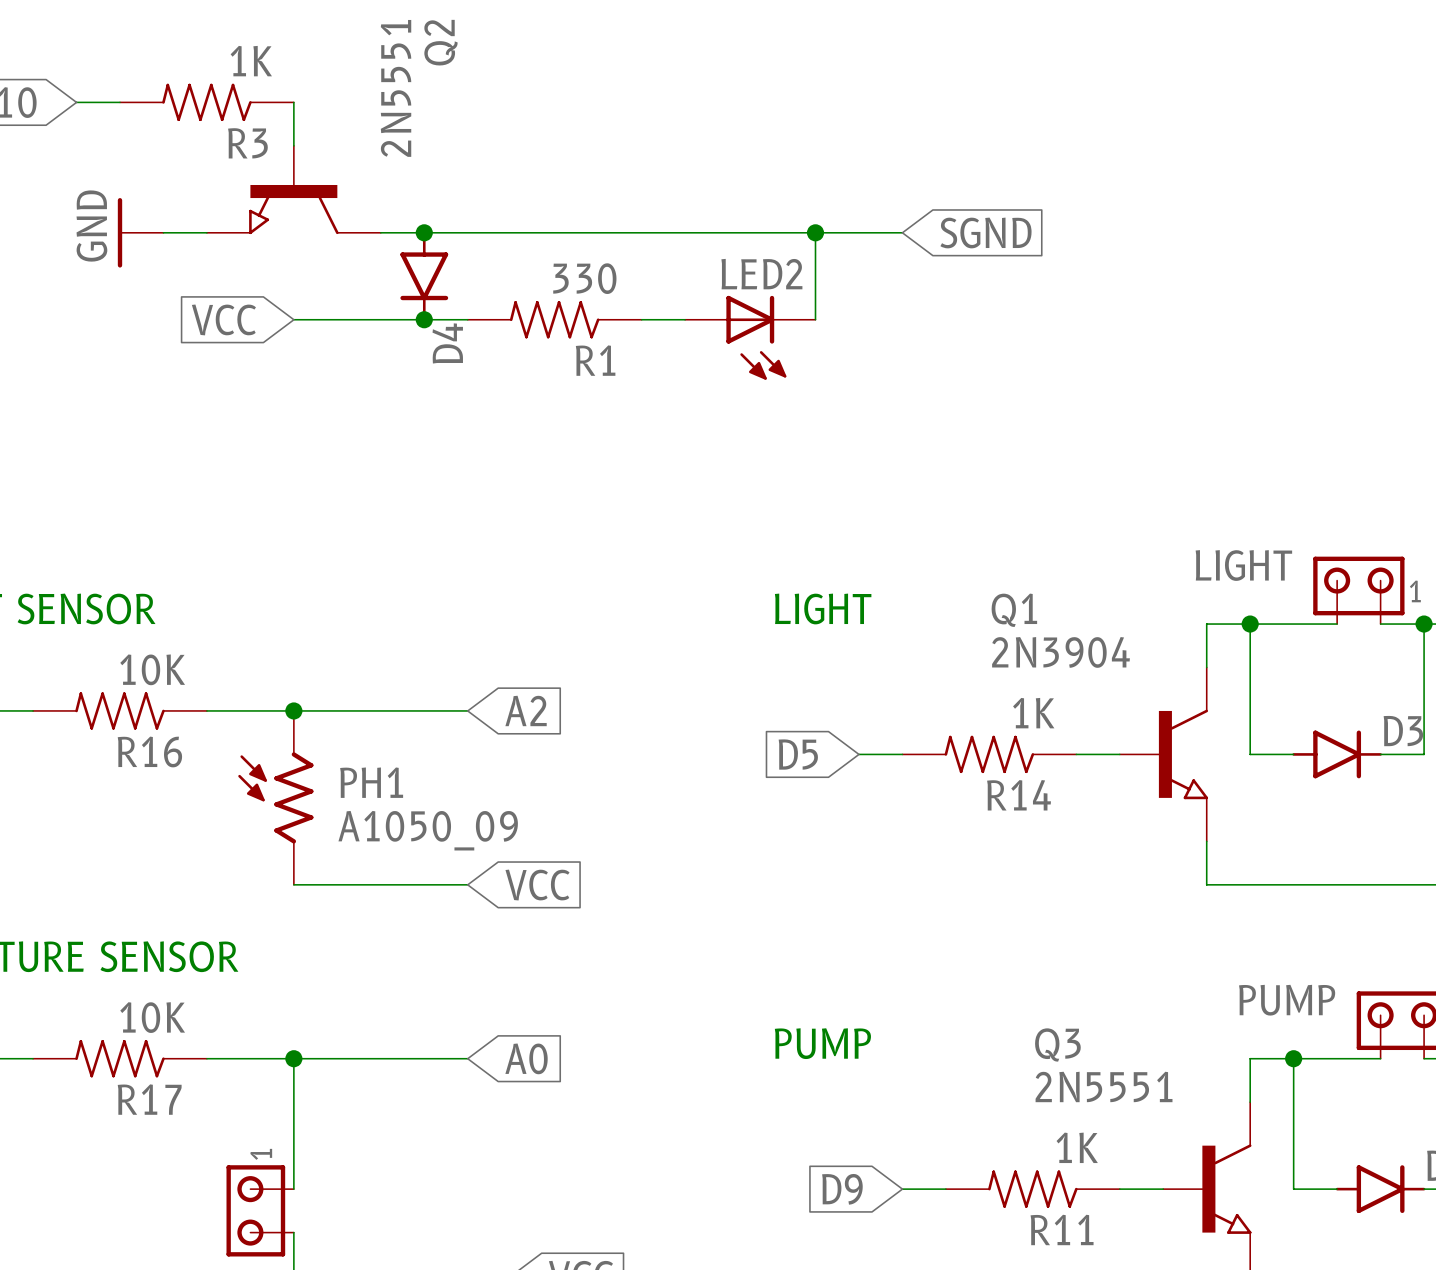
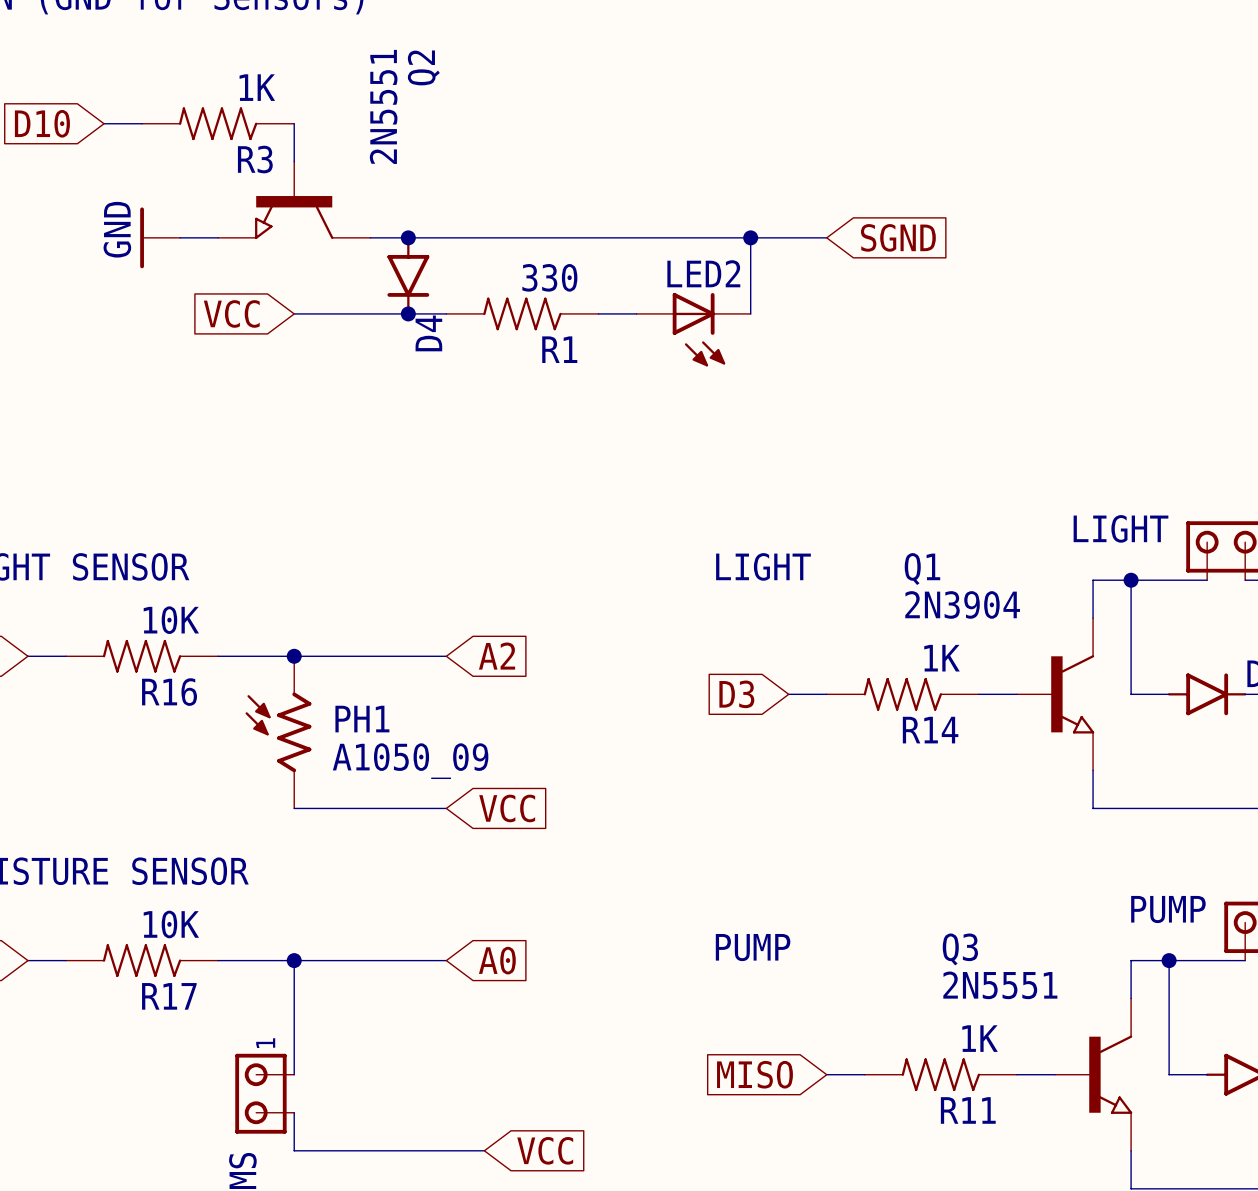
global label: D5 (798, 754) -> D3 (736, 694)
global label: D9 (842, 1189) -> MISO (754, 1074)

